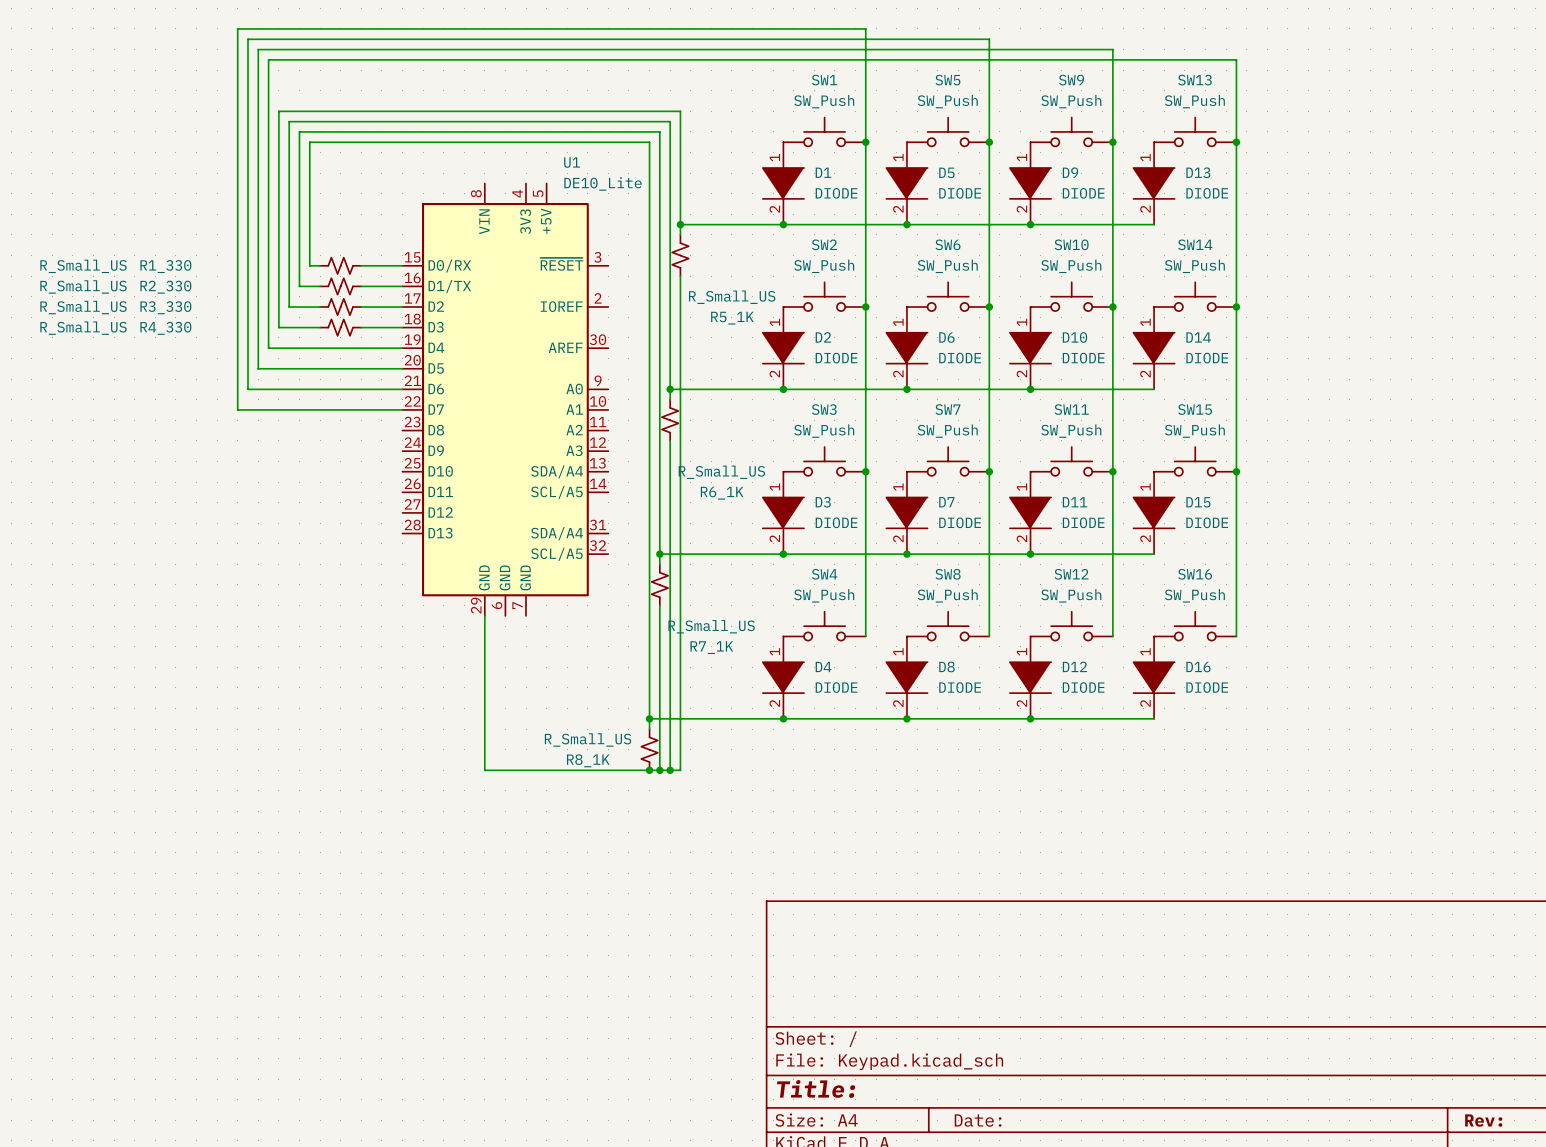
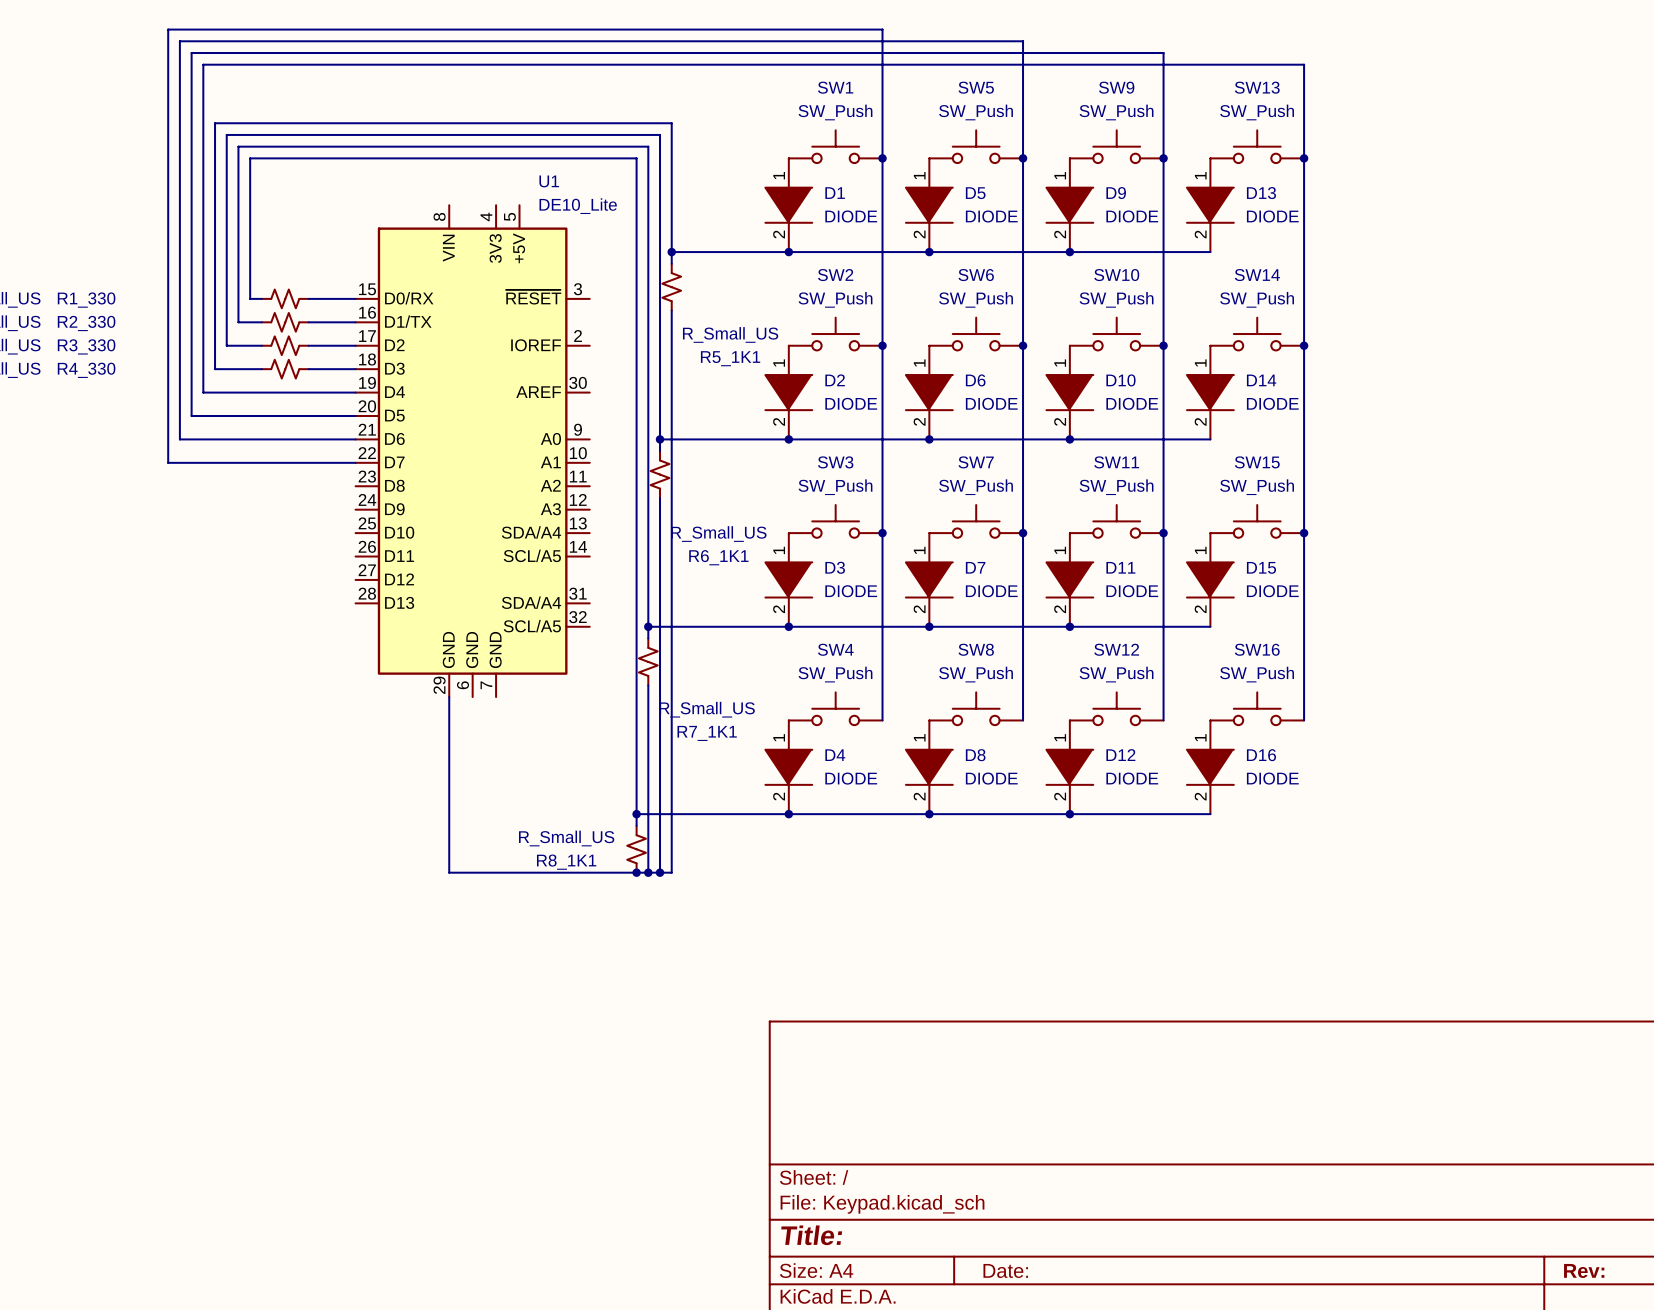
R5_1K name: R5_1K (732, 318) -> R5_1K1 (730, 358)
R6_1K name: R6_1K (722, 493) -> R6_1K1 (718, 557)
R7_1K name: R7_1K (711, 647) -> R7_1K1 (707, 733)
R8_1K name: R8_1K (588, 760) -> R8_1K1 (566, 862)

